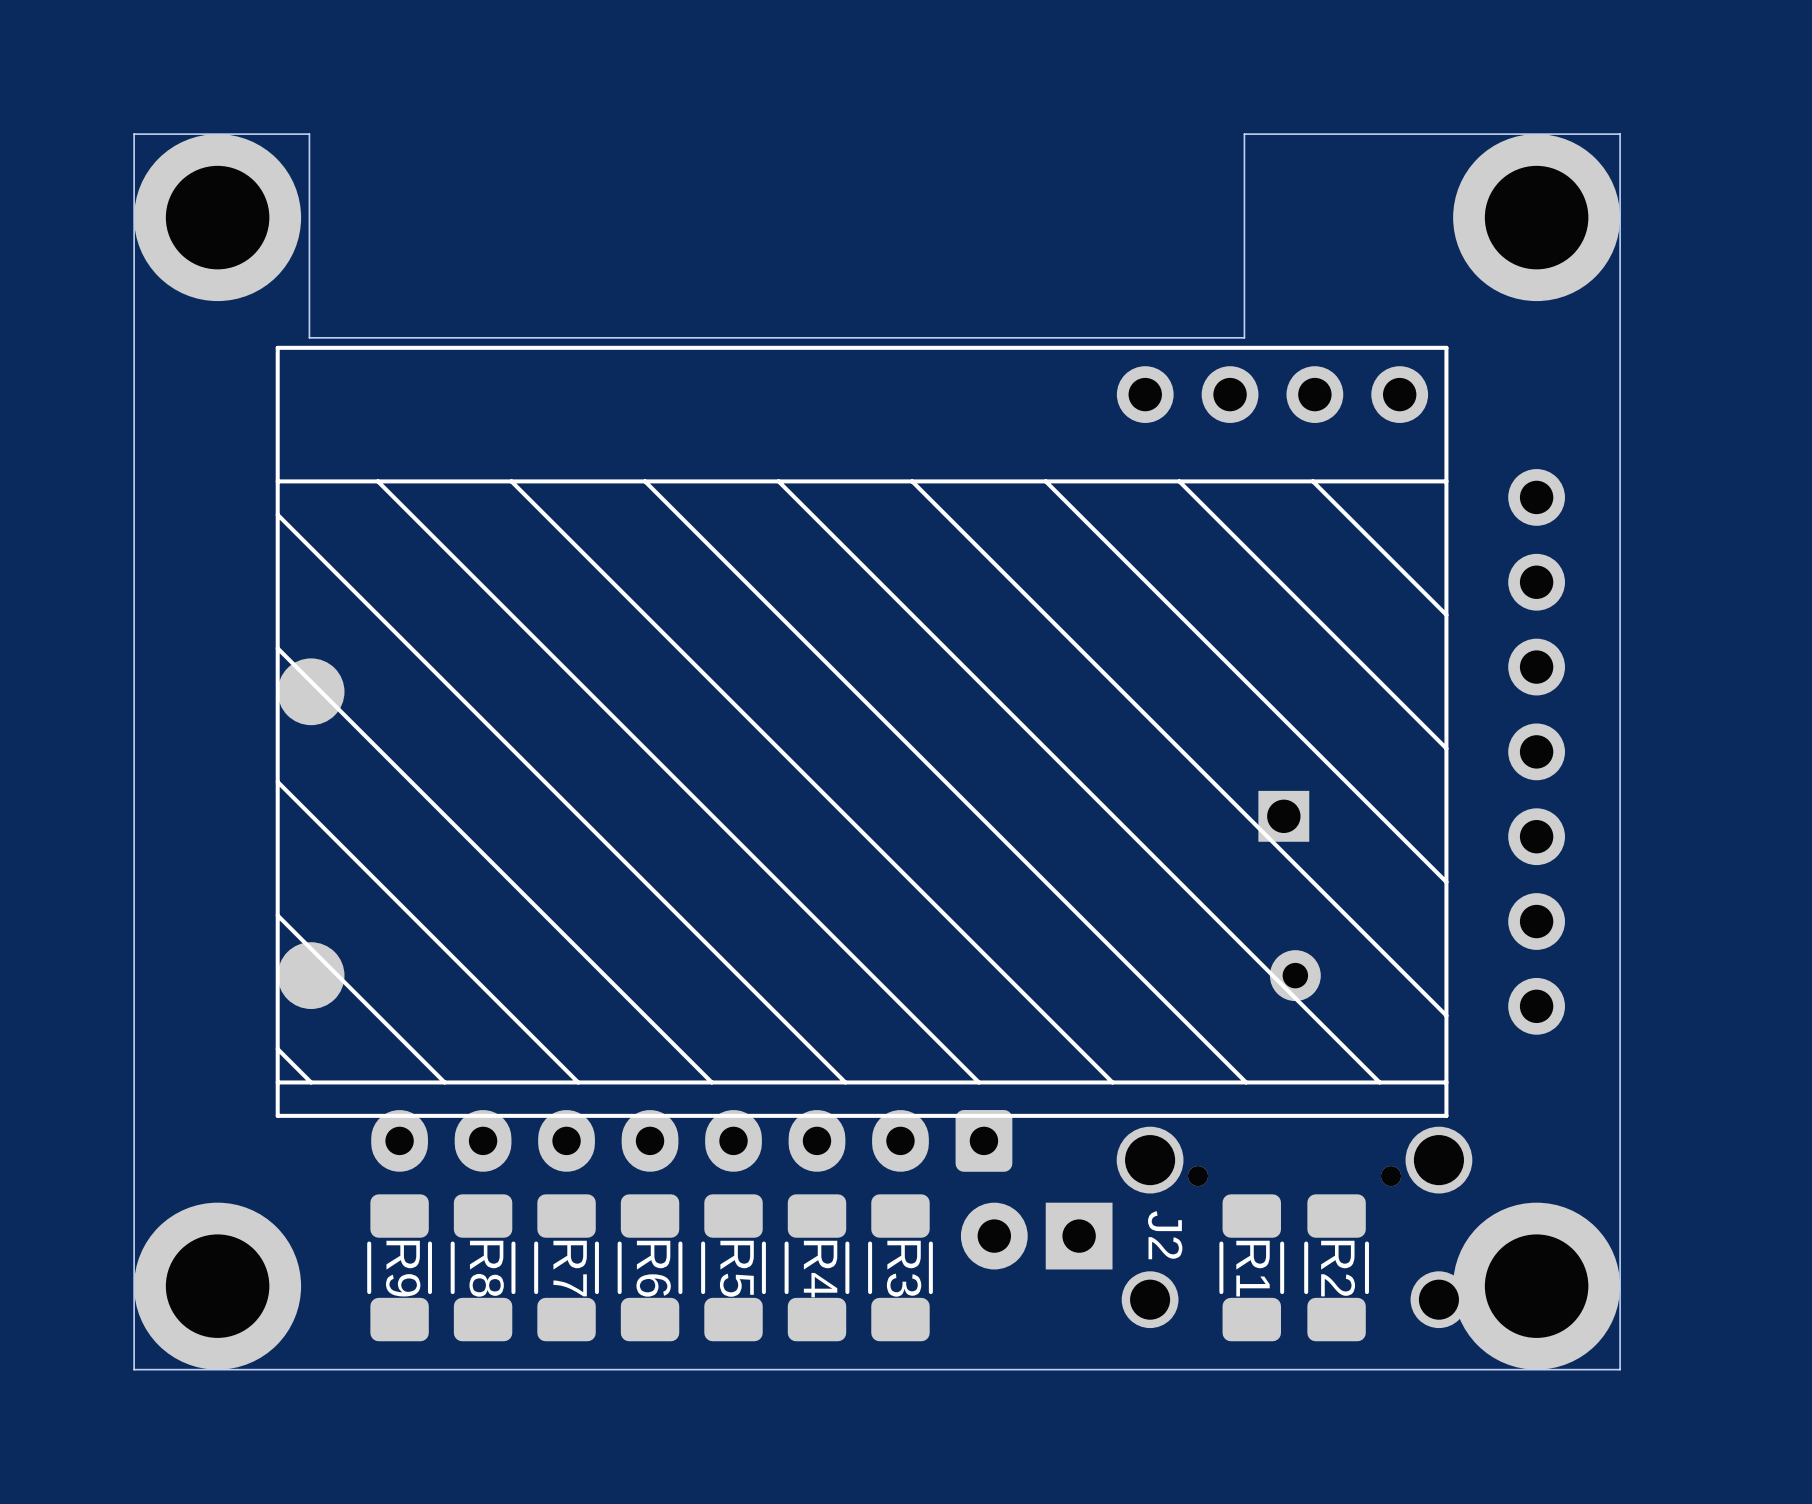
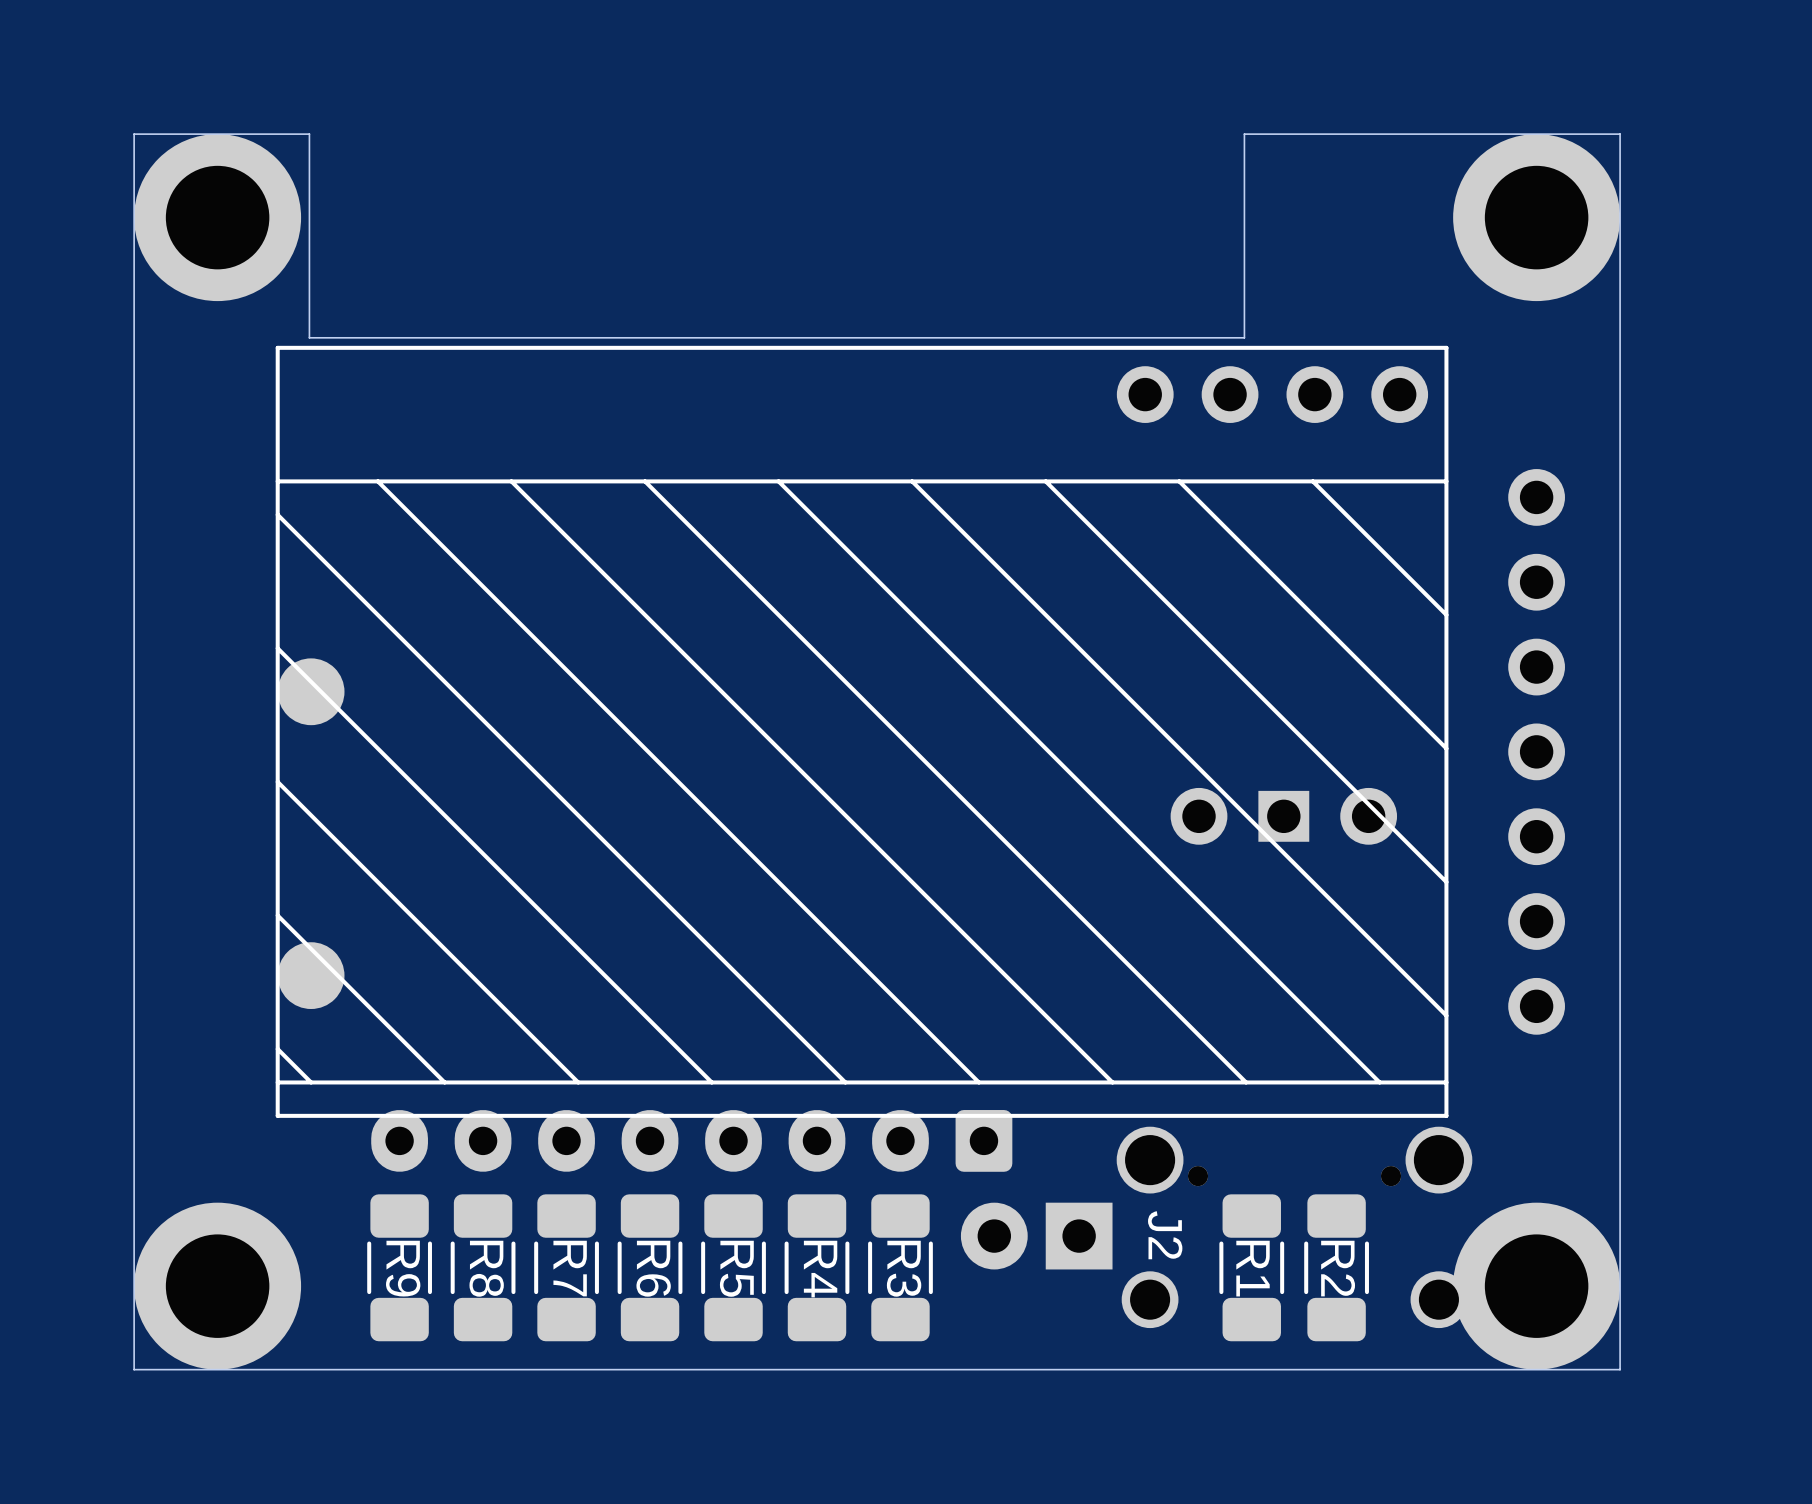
part footprint: [1258, 790, 1310, 842] -> [1170, 787, 1398, 845]
part: (1295, 975) -> none

